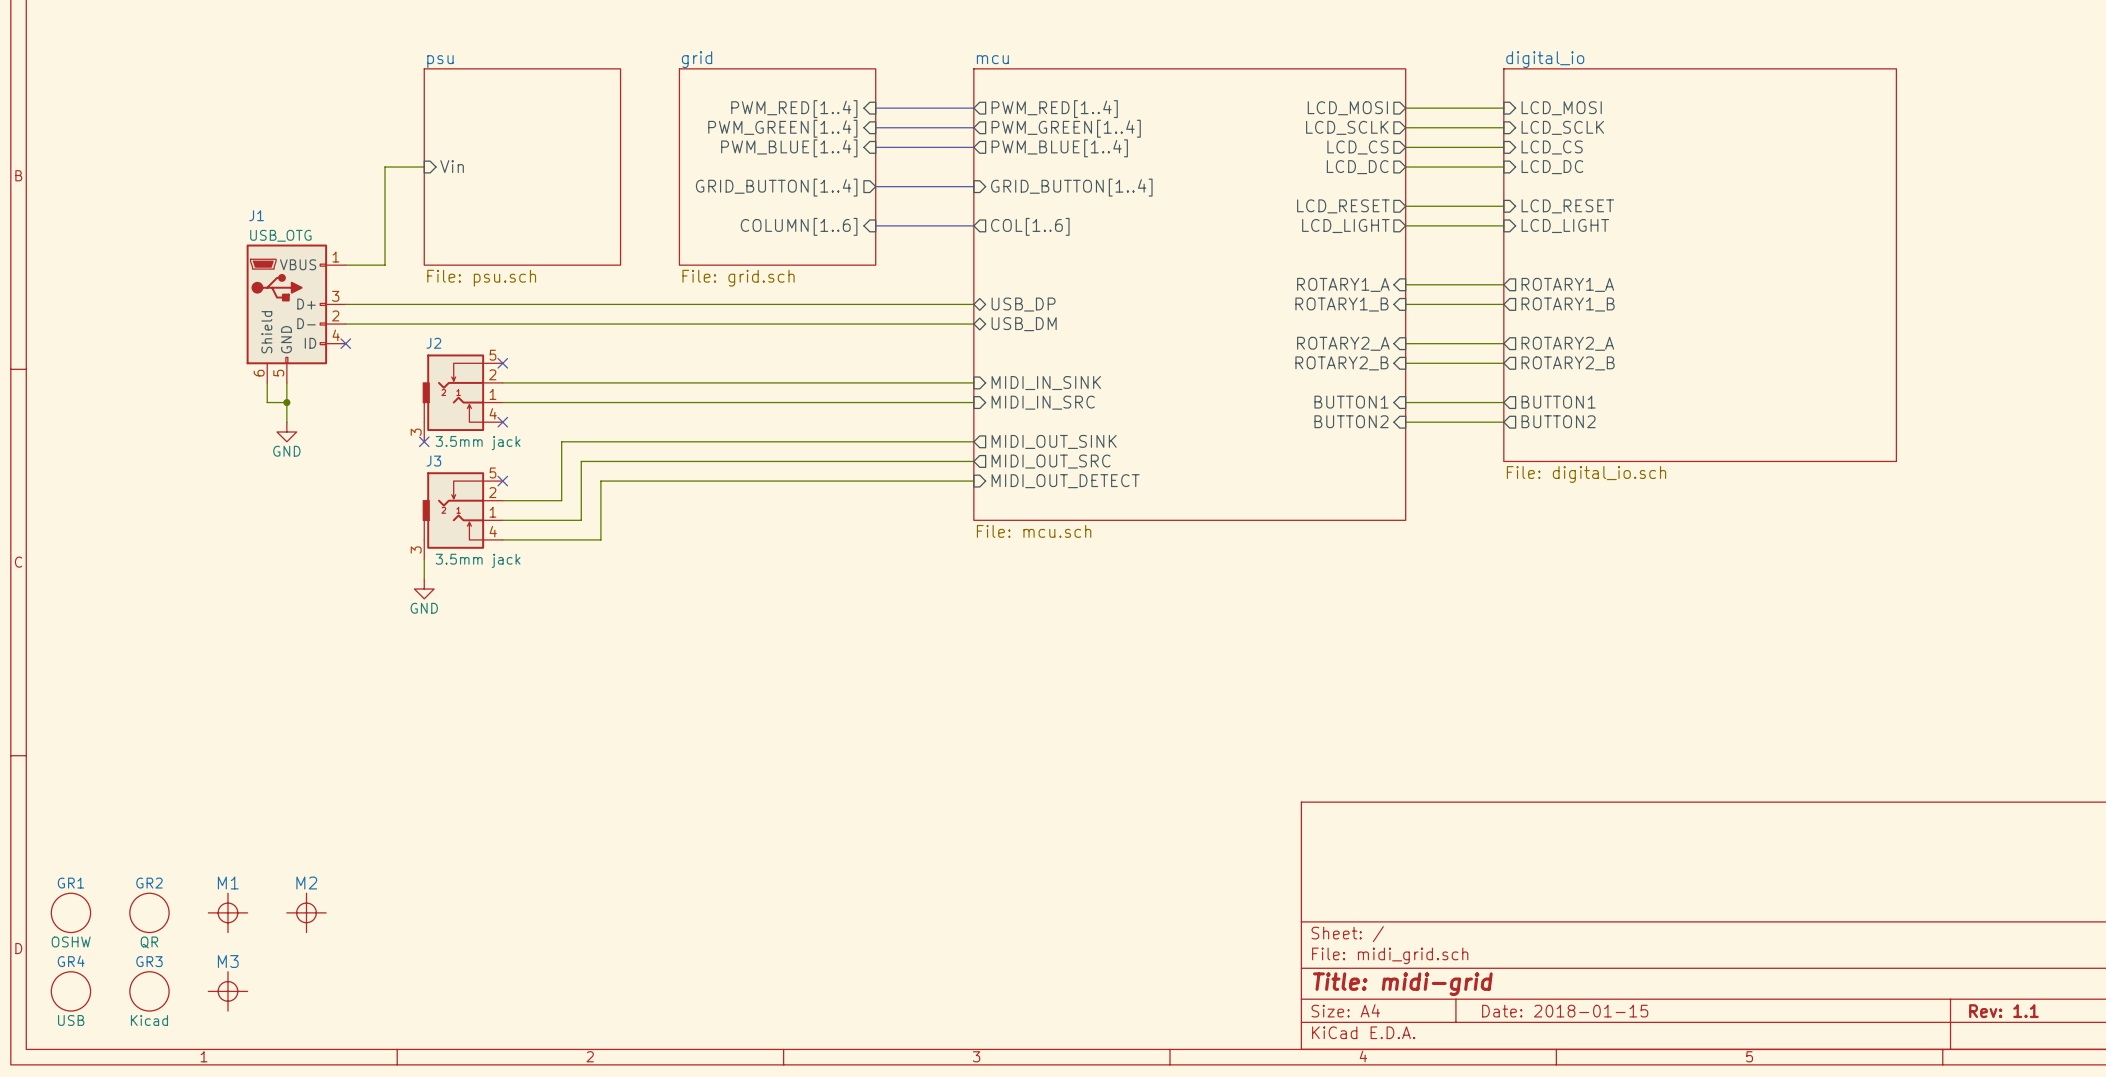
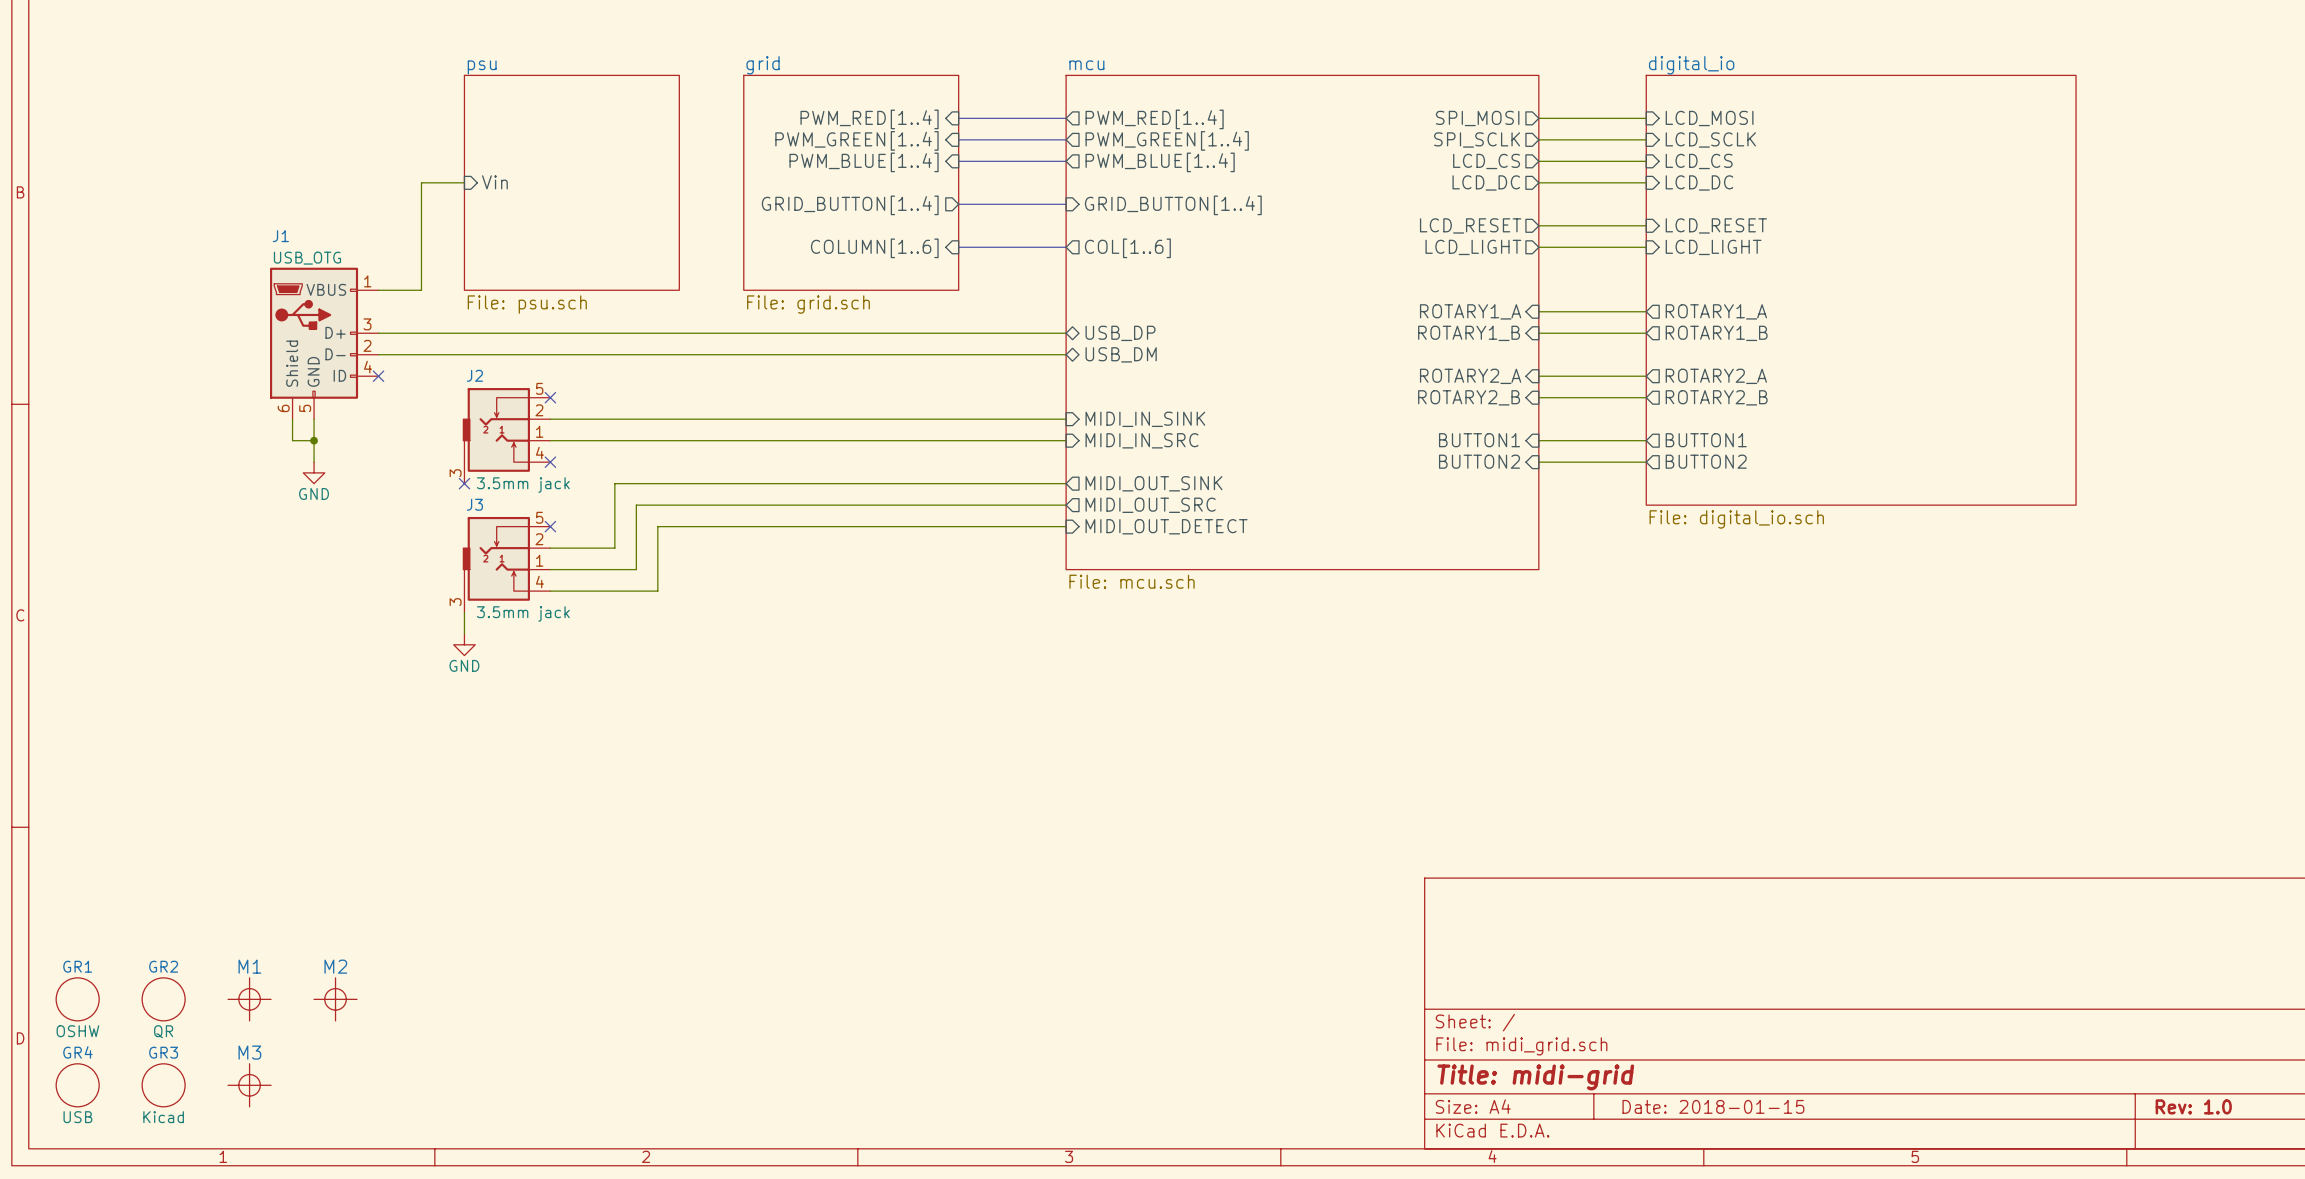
sheet pin: LCD_MOSI (1347, 108) -> SPI_MOSI (1477, 118)
sheet pin: LCD_SCLK (1347, 127) -> SPI_SCLK (1477, 139)
title block: Rev: 1.1 (2003, 1011) -> Rev: 1.0 (2193, 1106)

